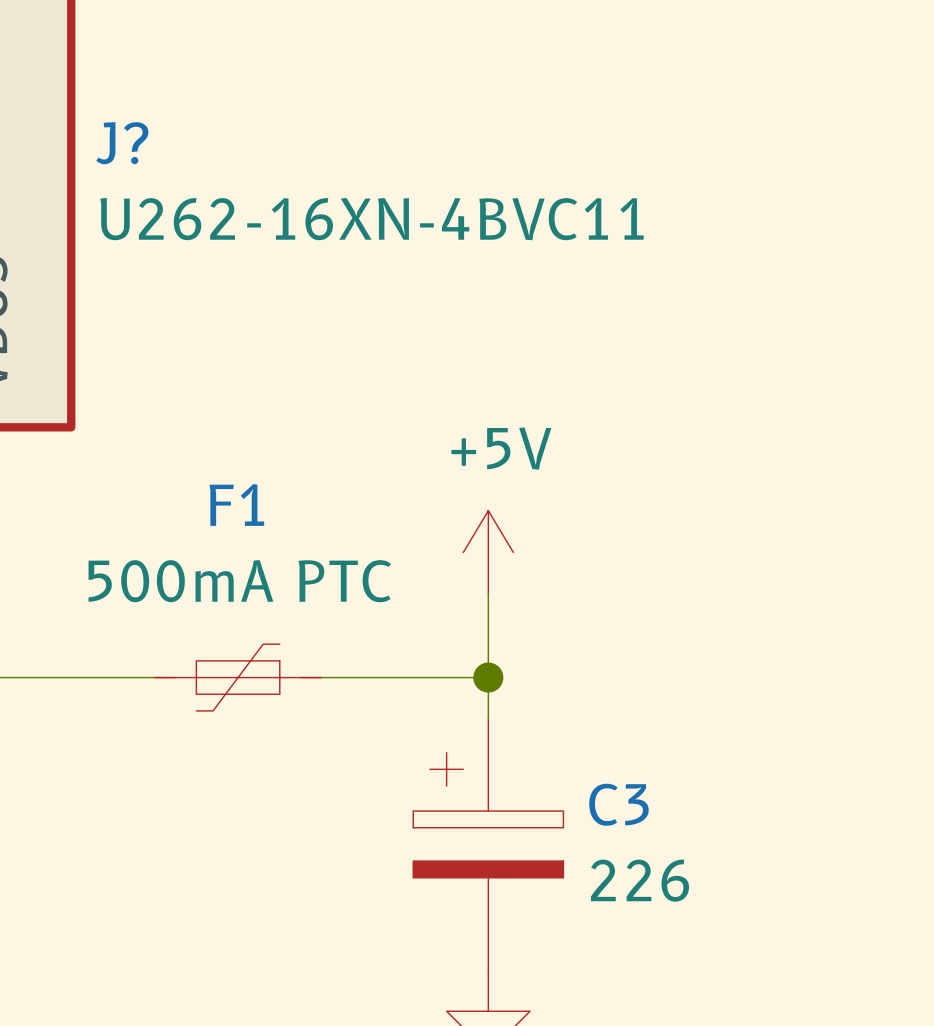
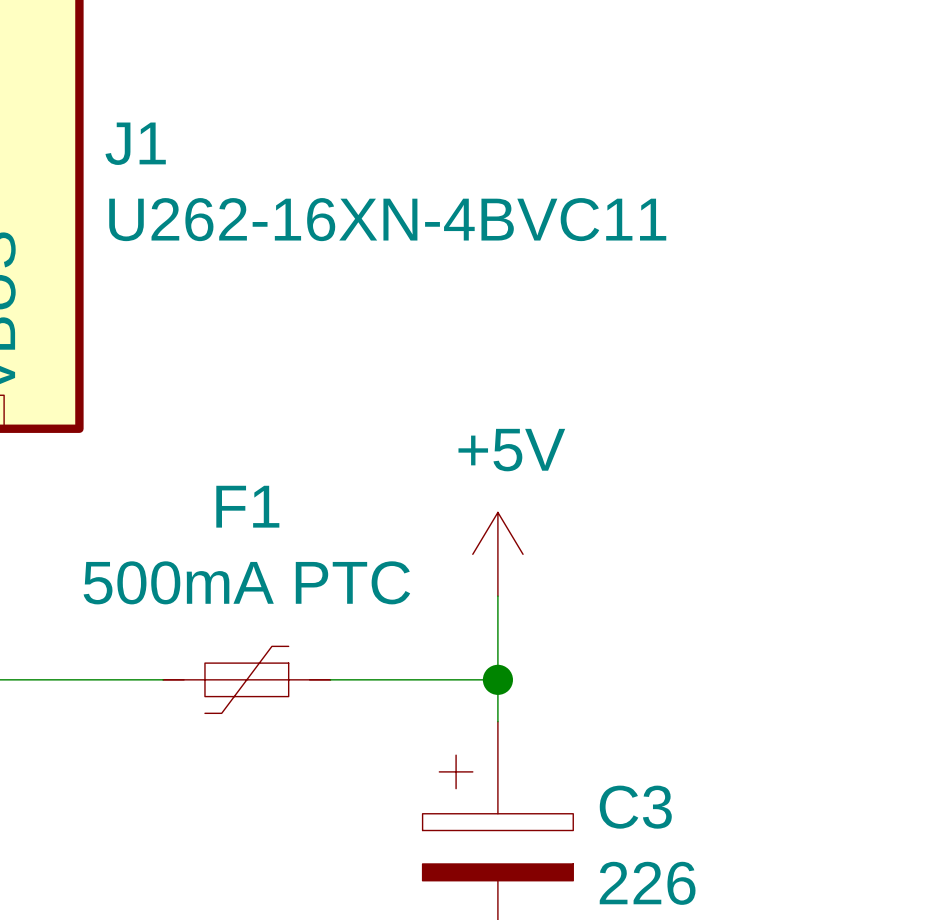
J? name: J? (122, 143) -> J1 (135, 143)

